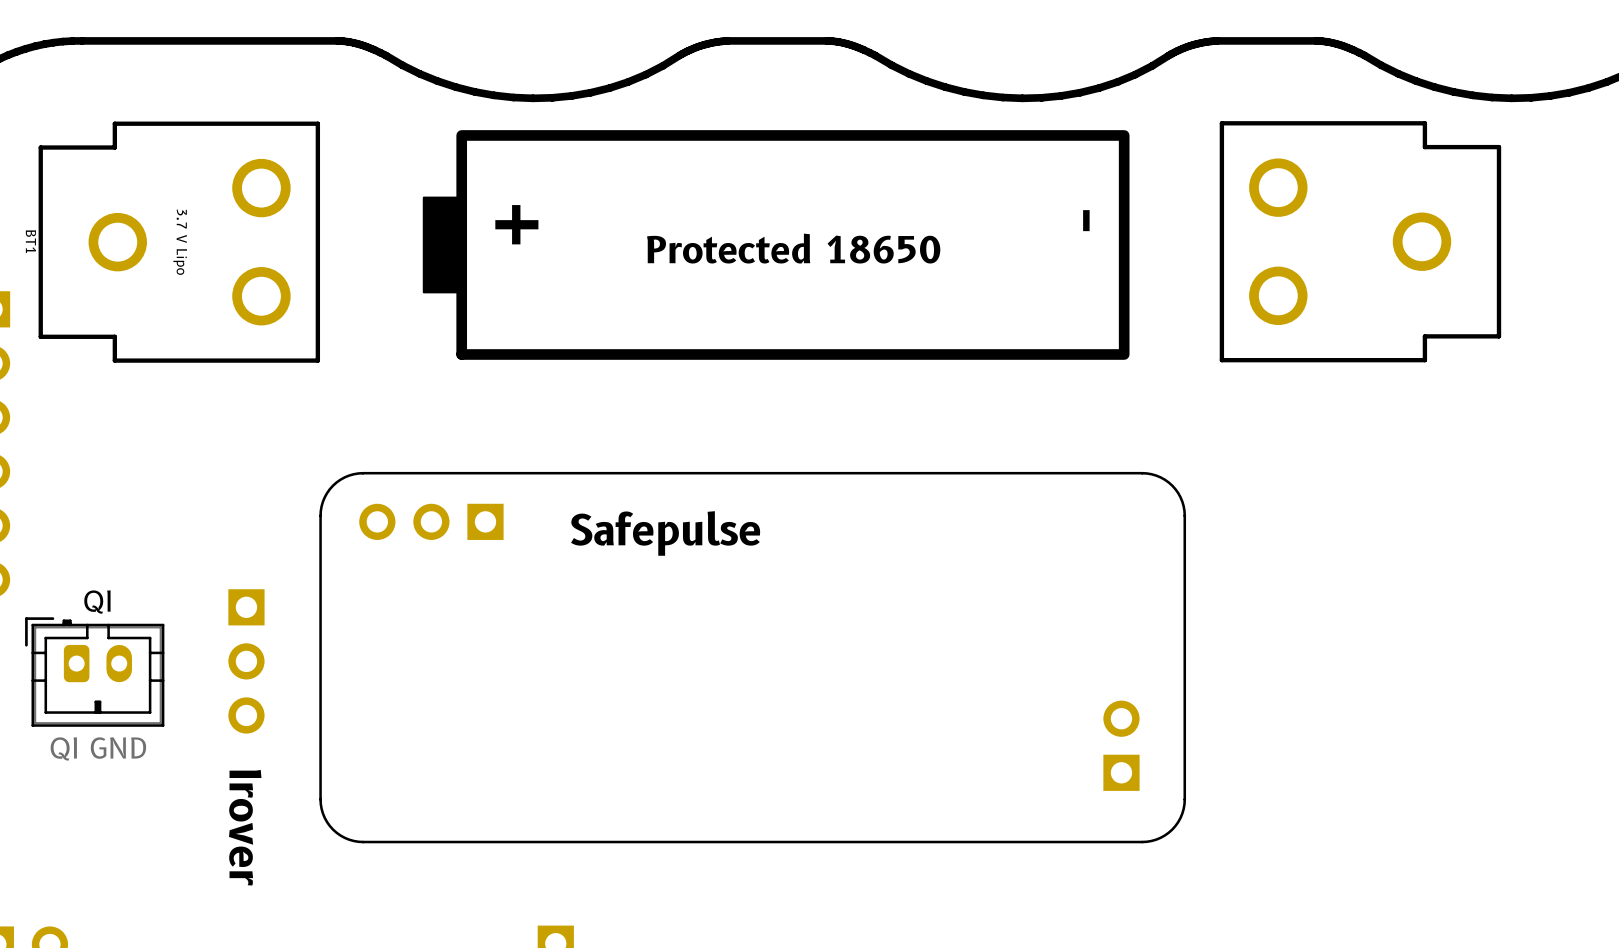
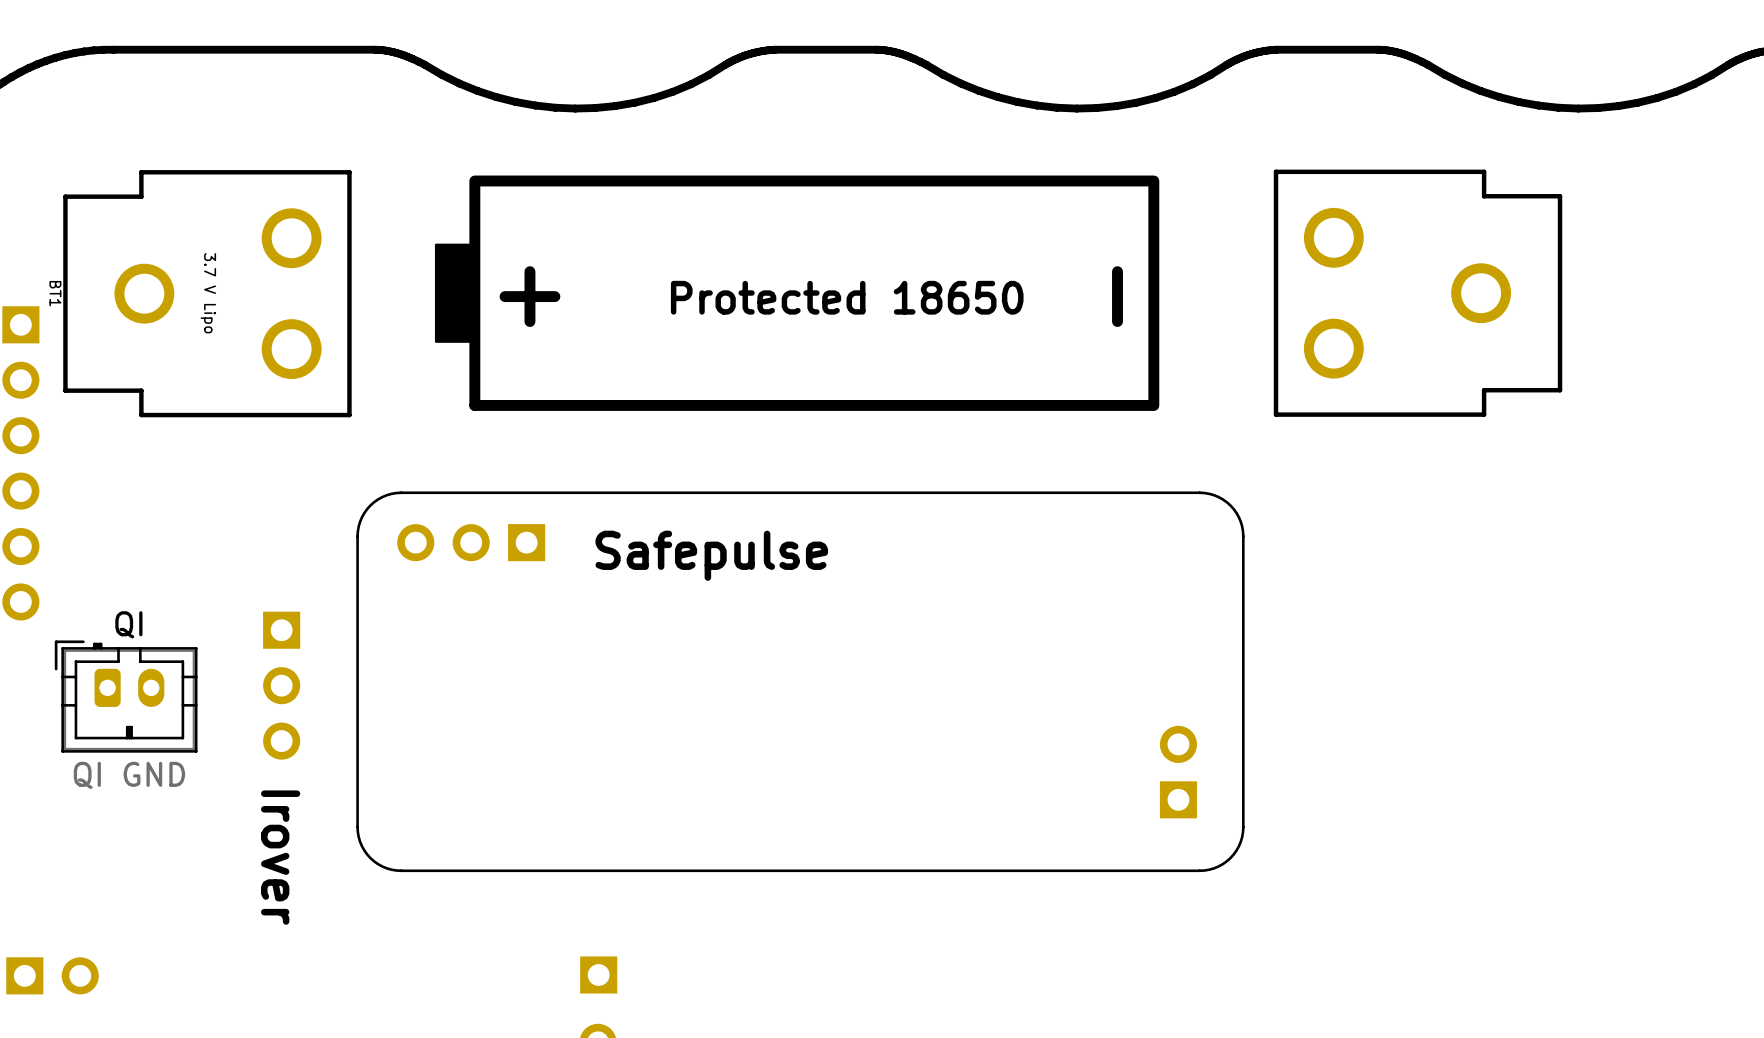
BT1 position: (769, 241) -> (812, 293)
drawing position: (776, 244) -> (797, 293)

